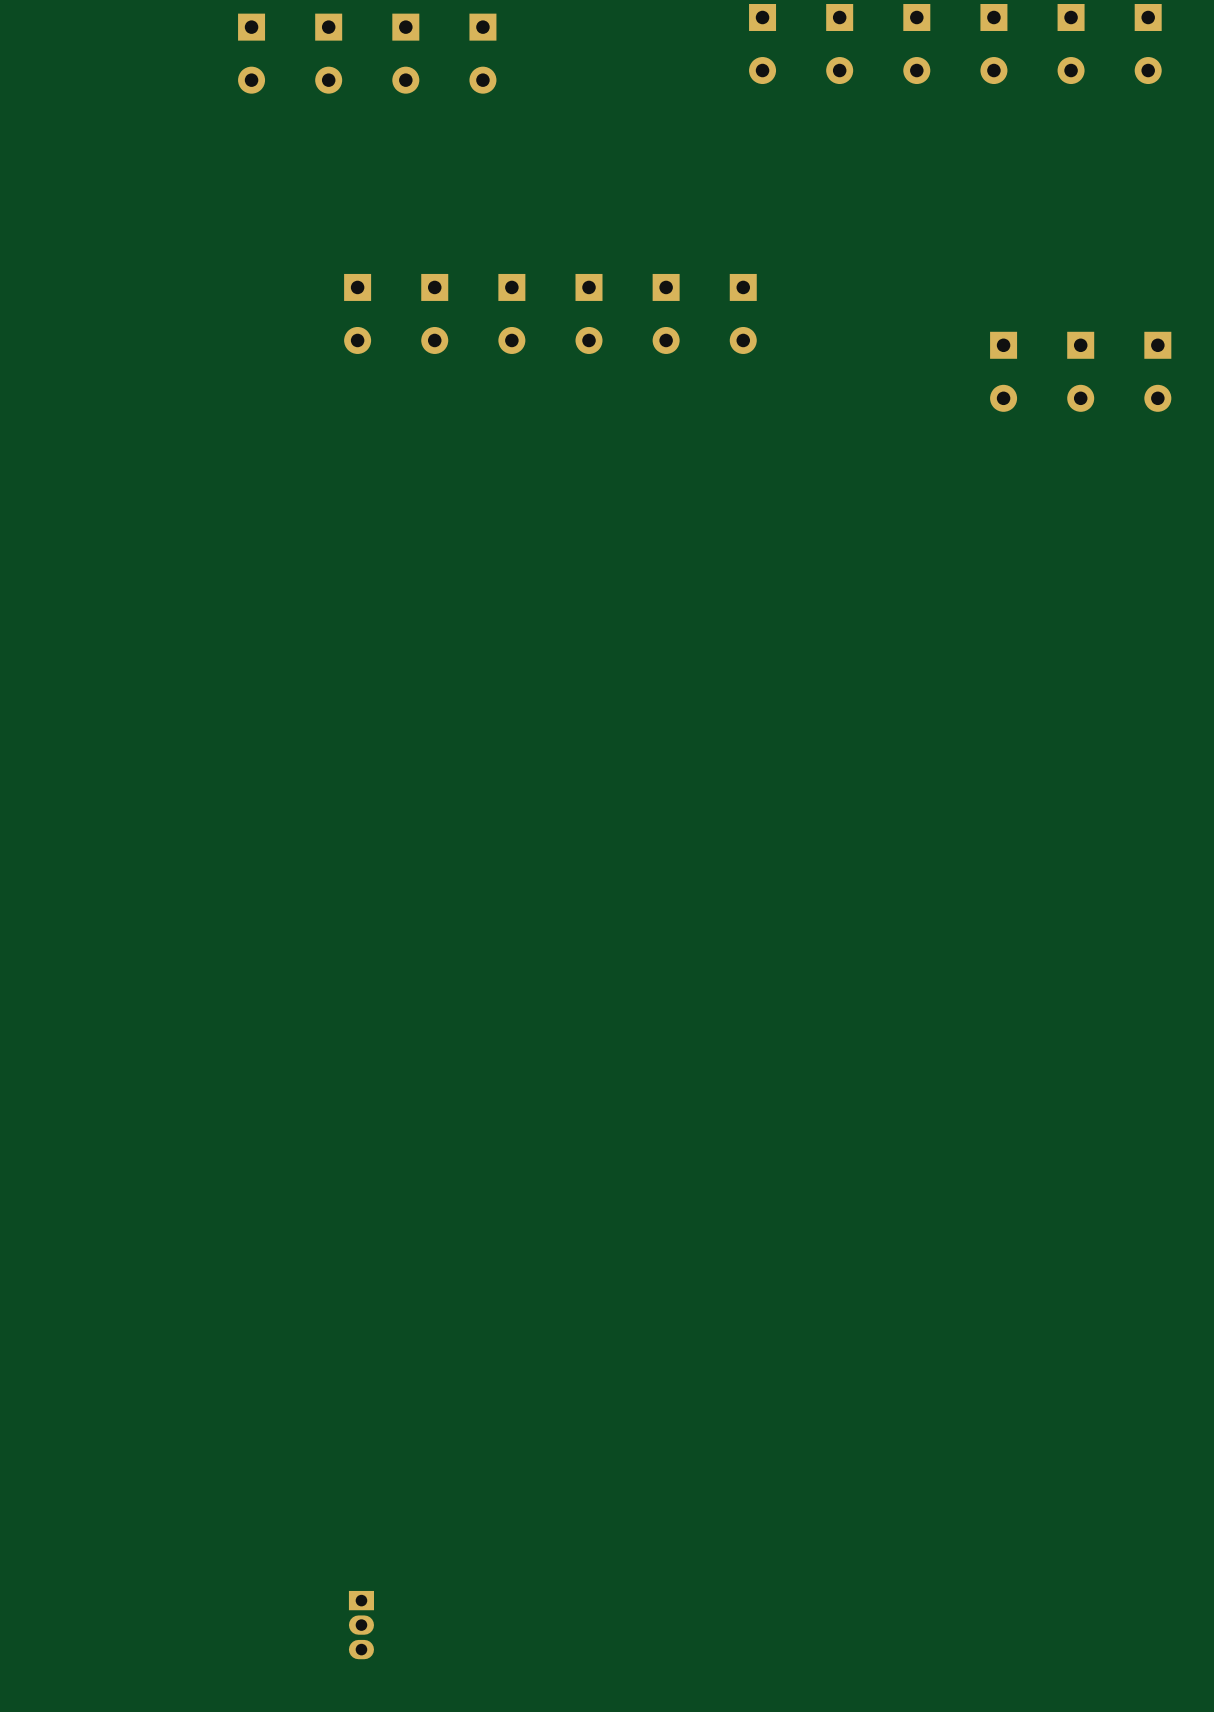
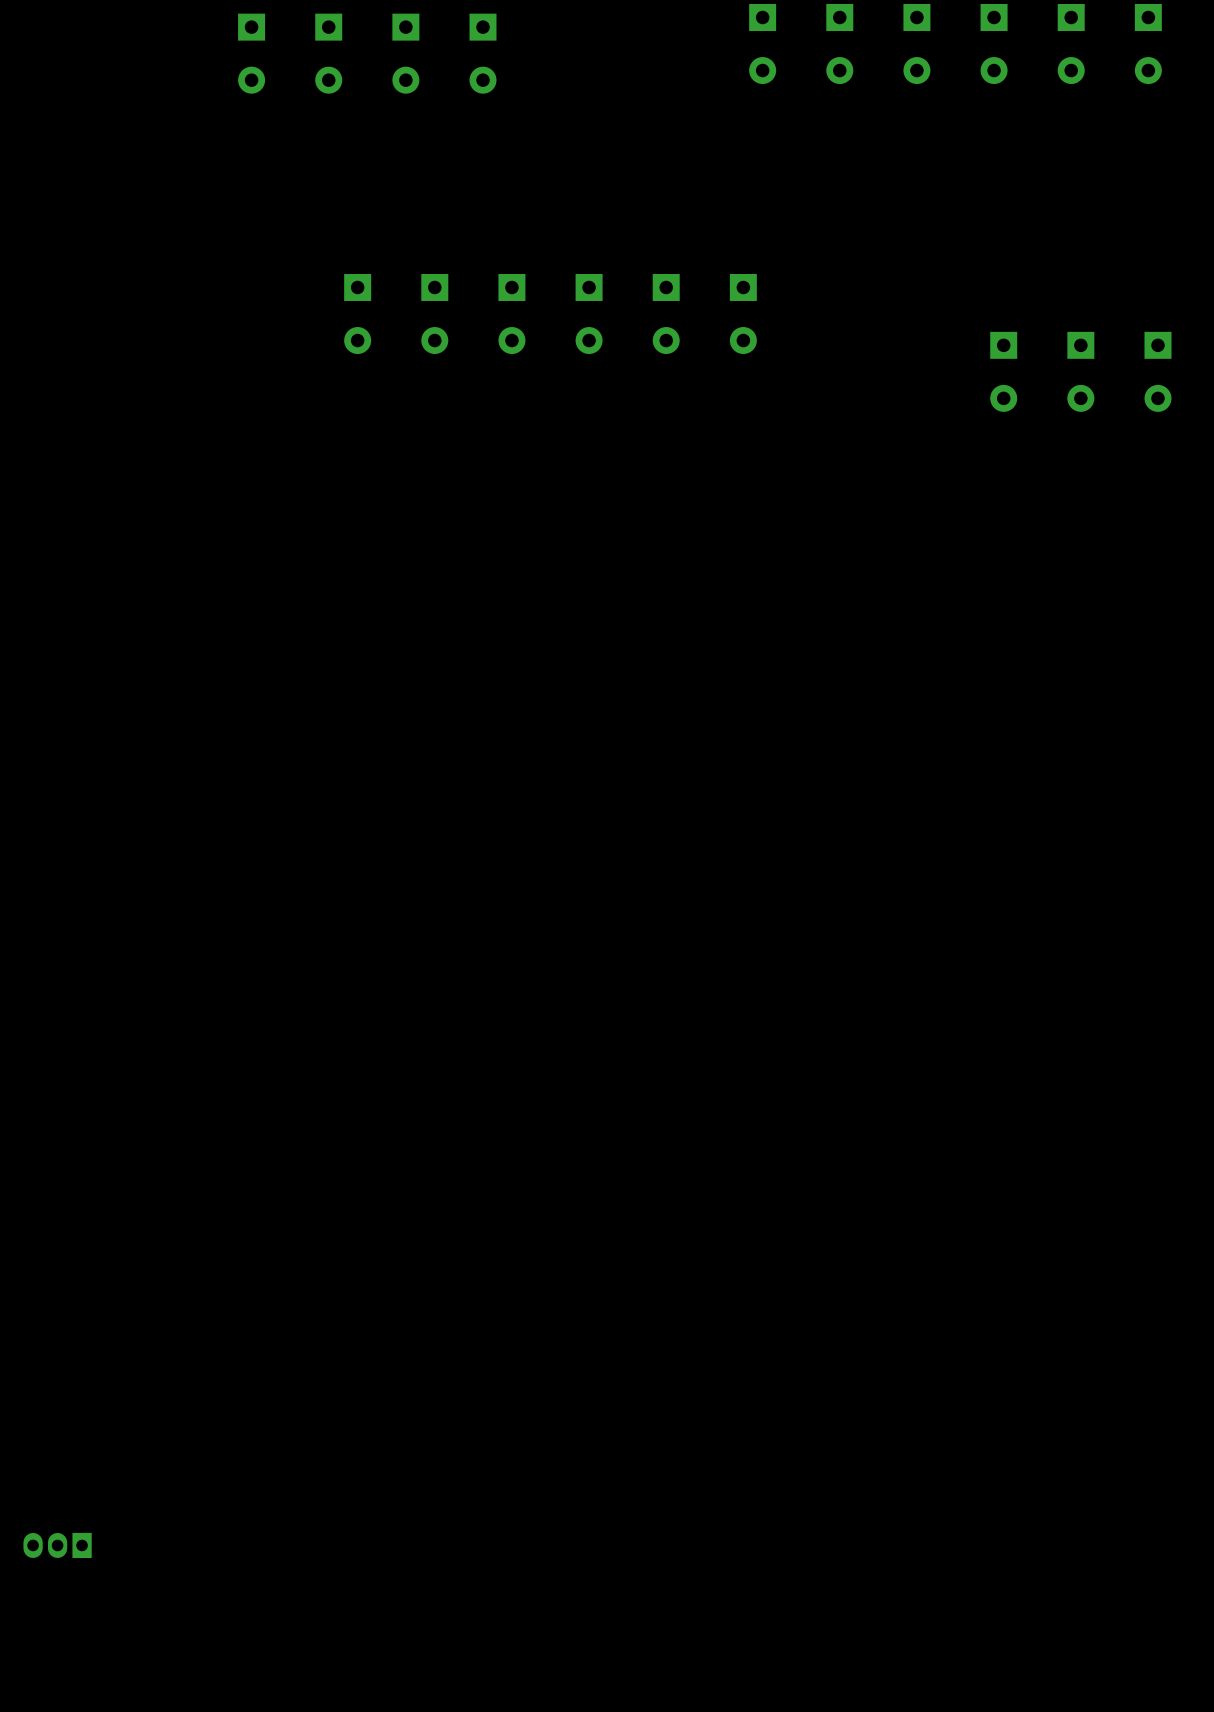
part: none -> (57, 1545)
part: (361, 1625) -> none

